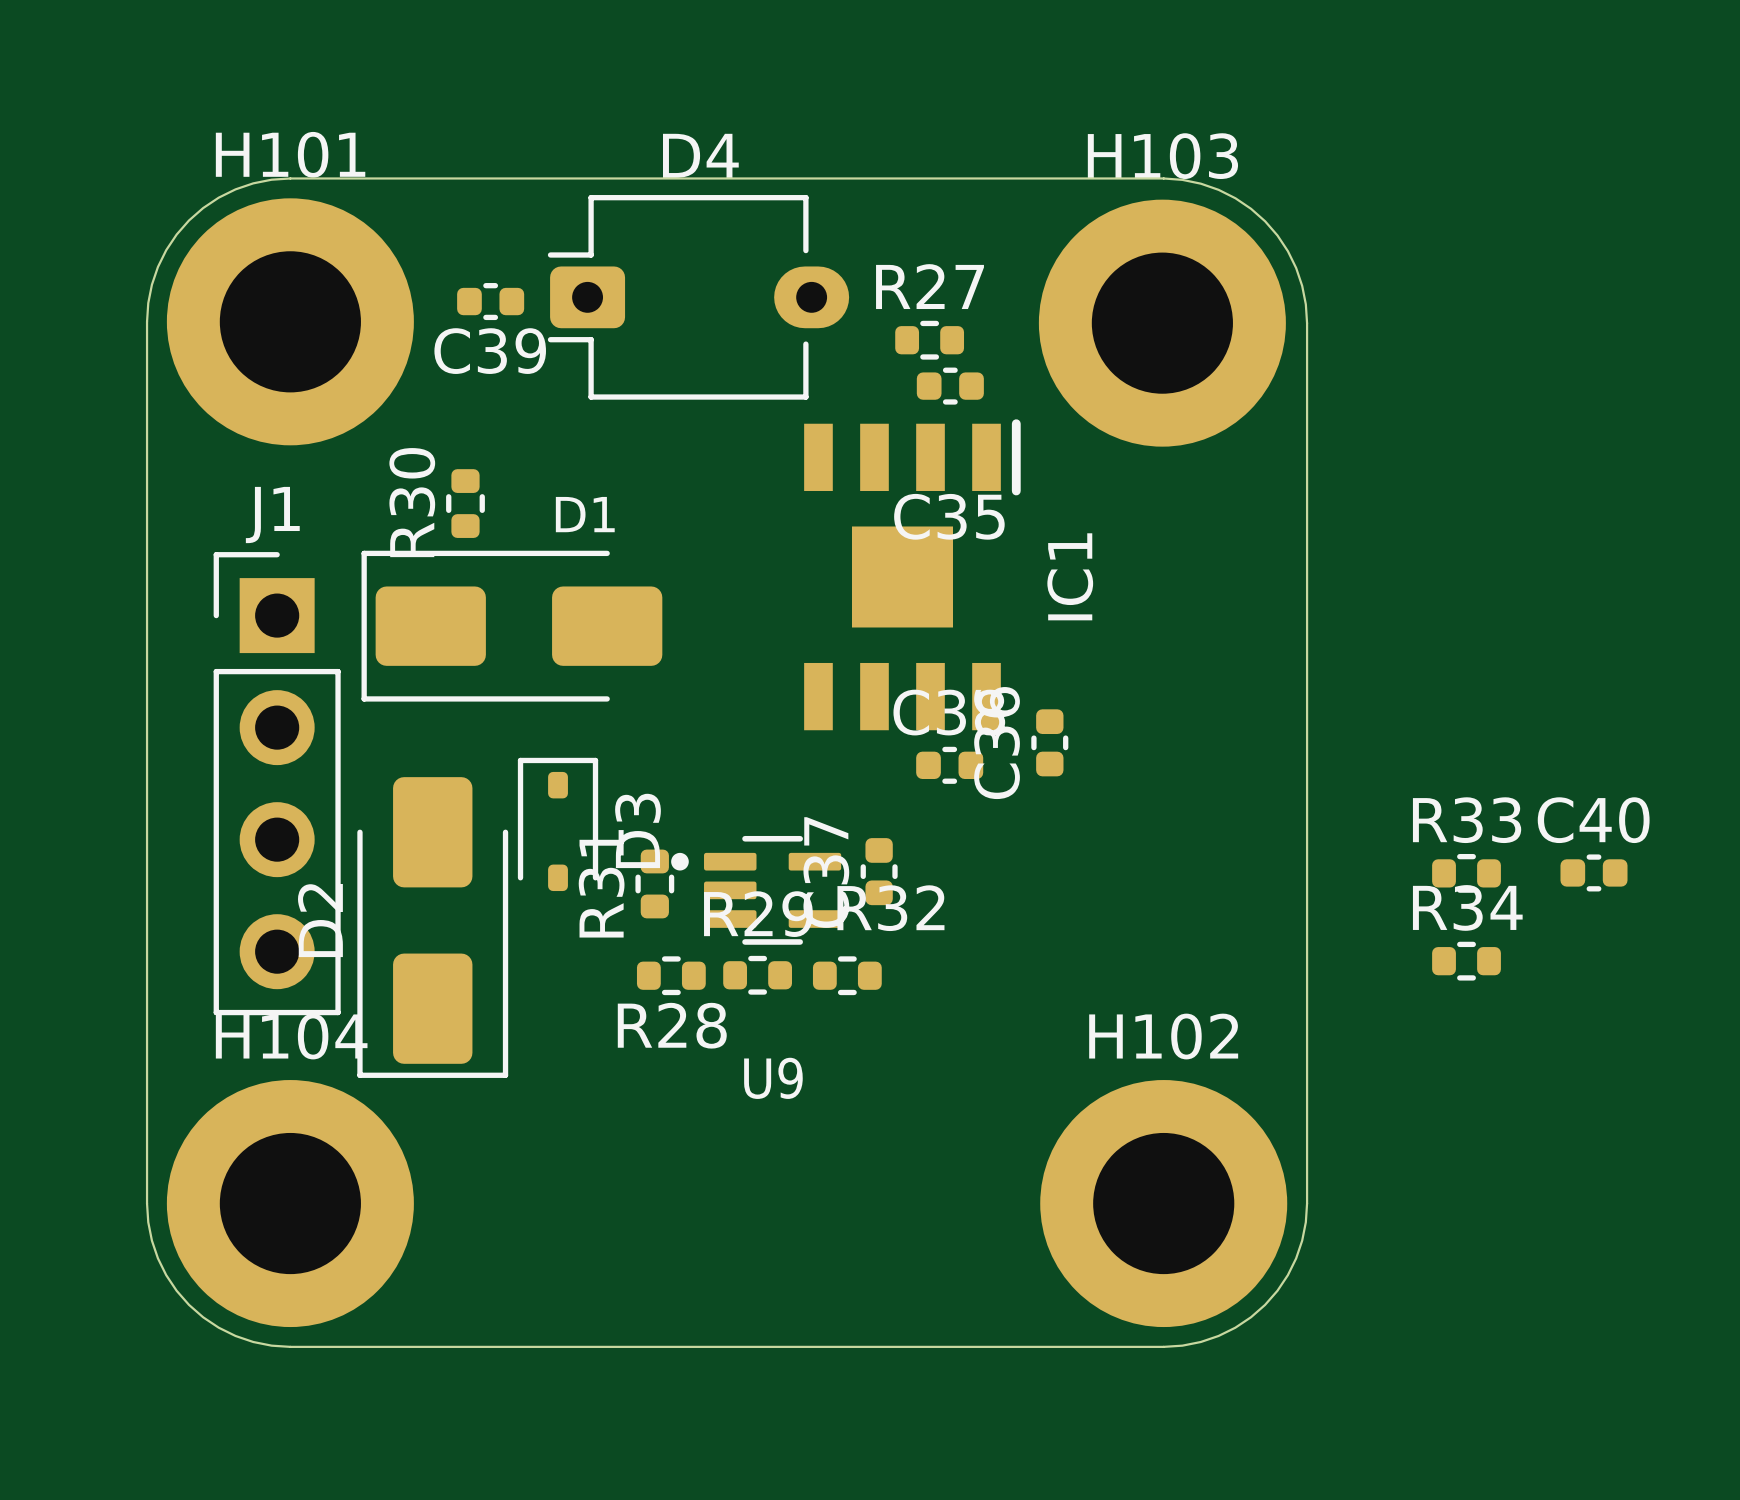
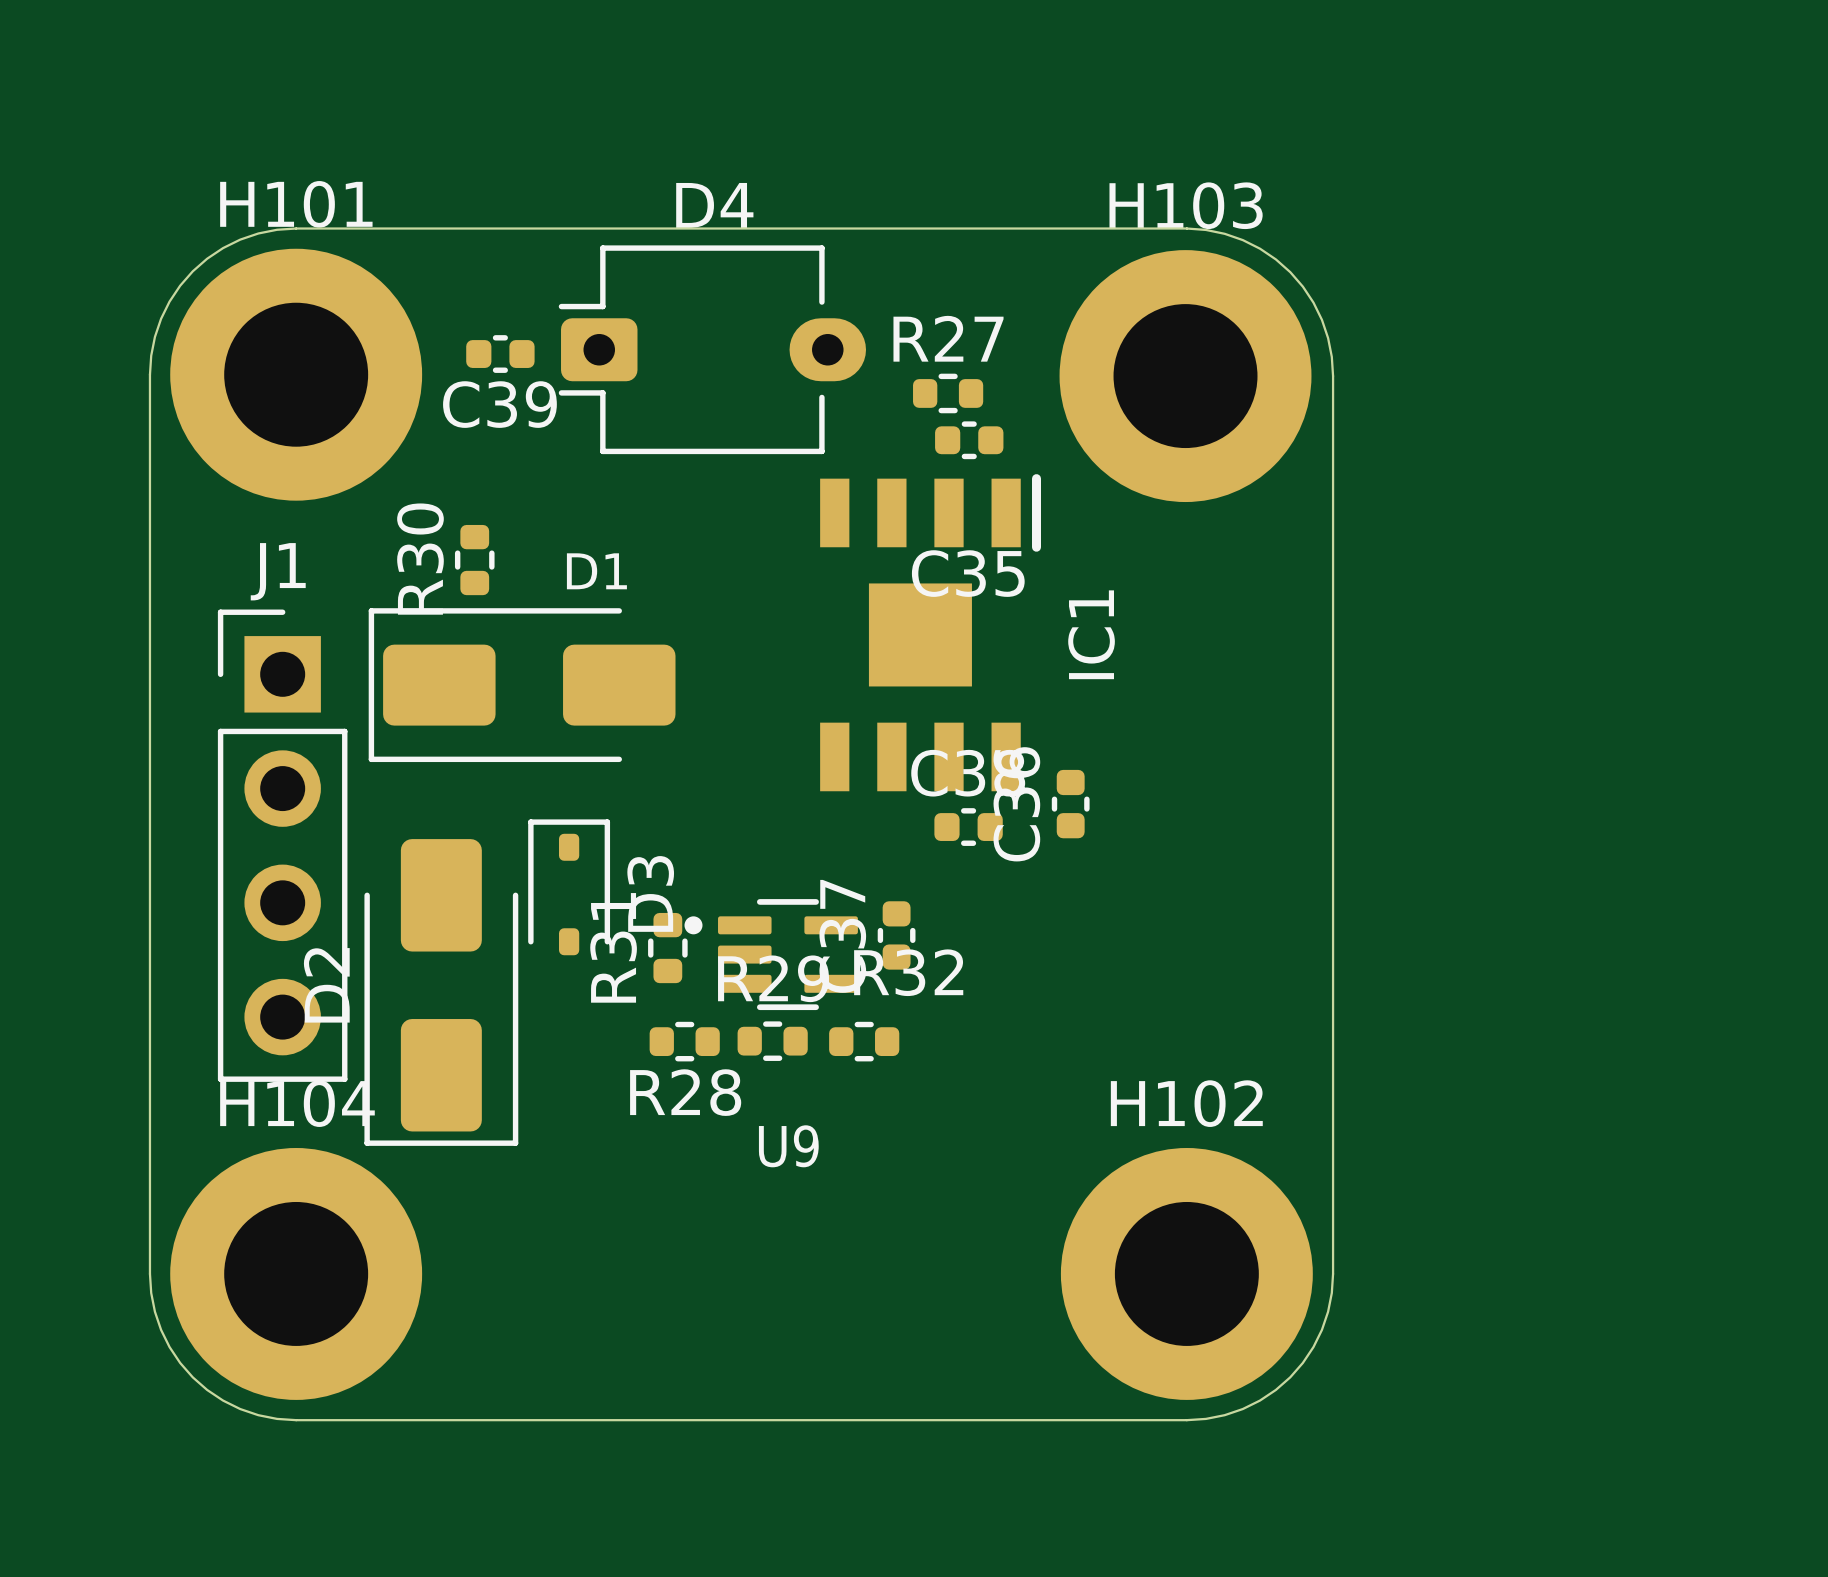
C40: (1593, 872) -> none
R33: (1466, 873) -> none
R34: (1466, 961) -> none

